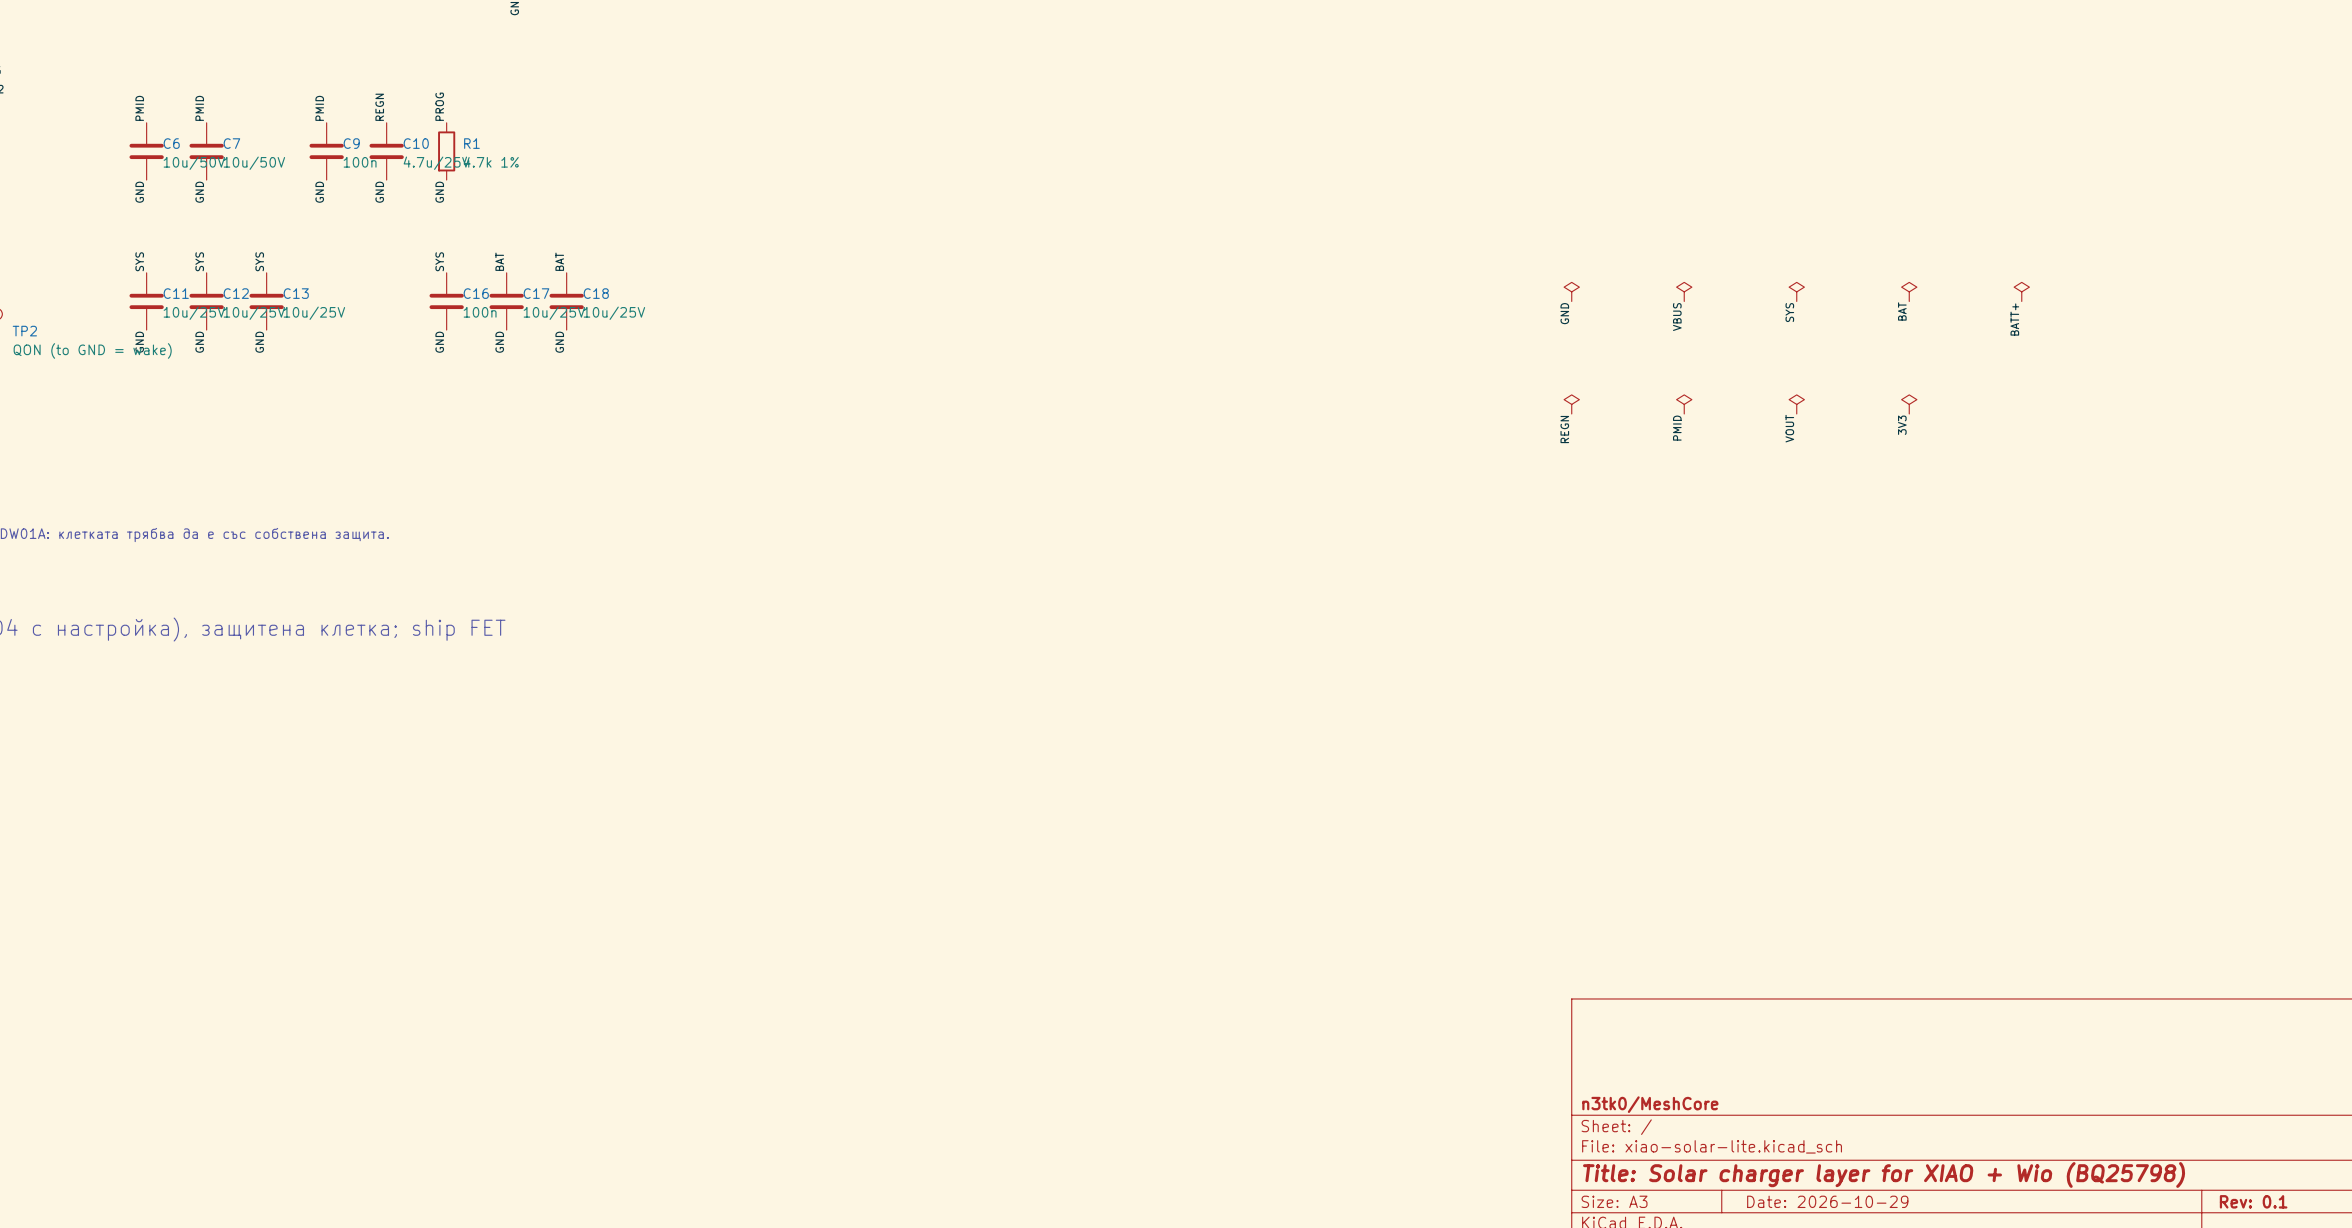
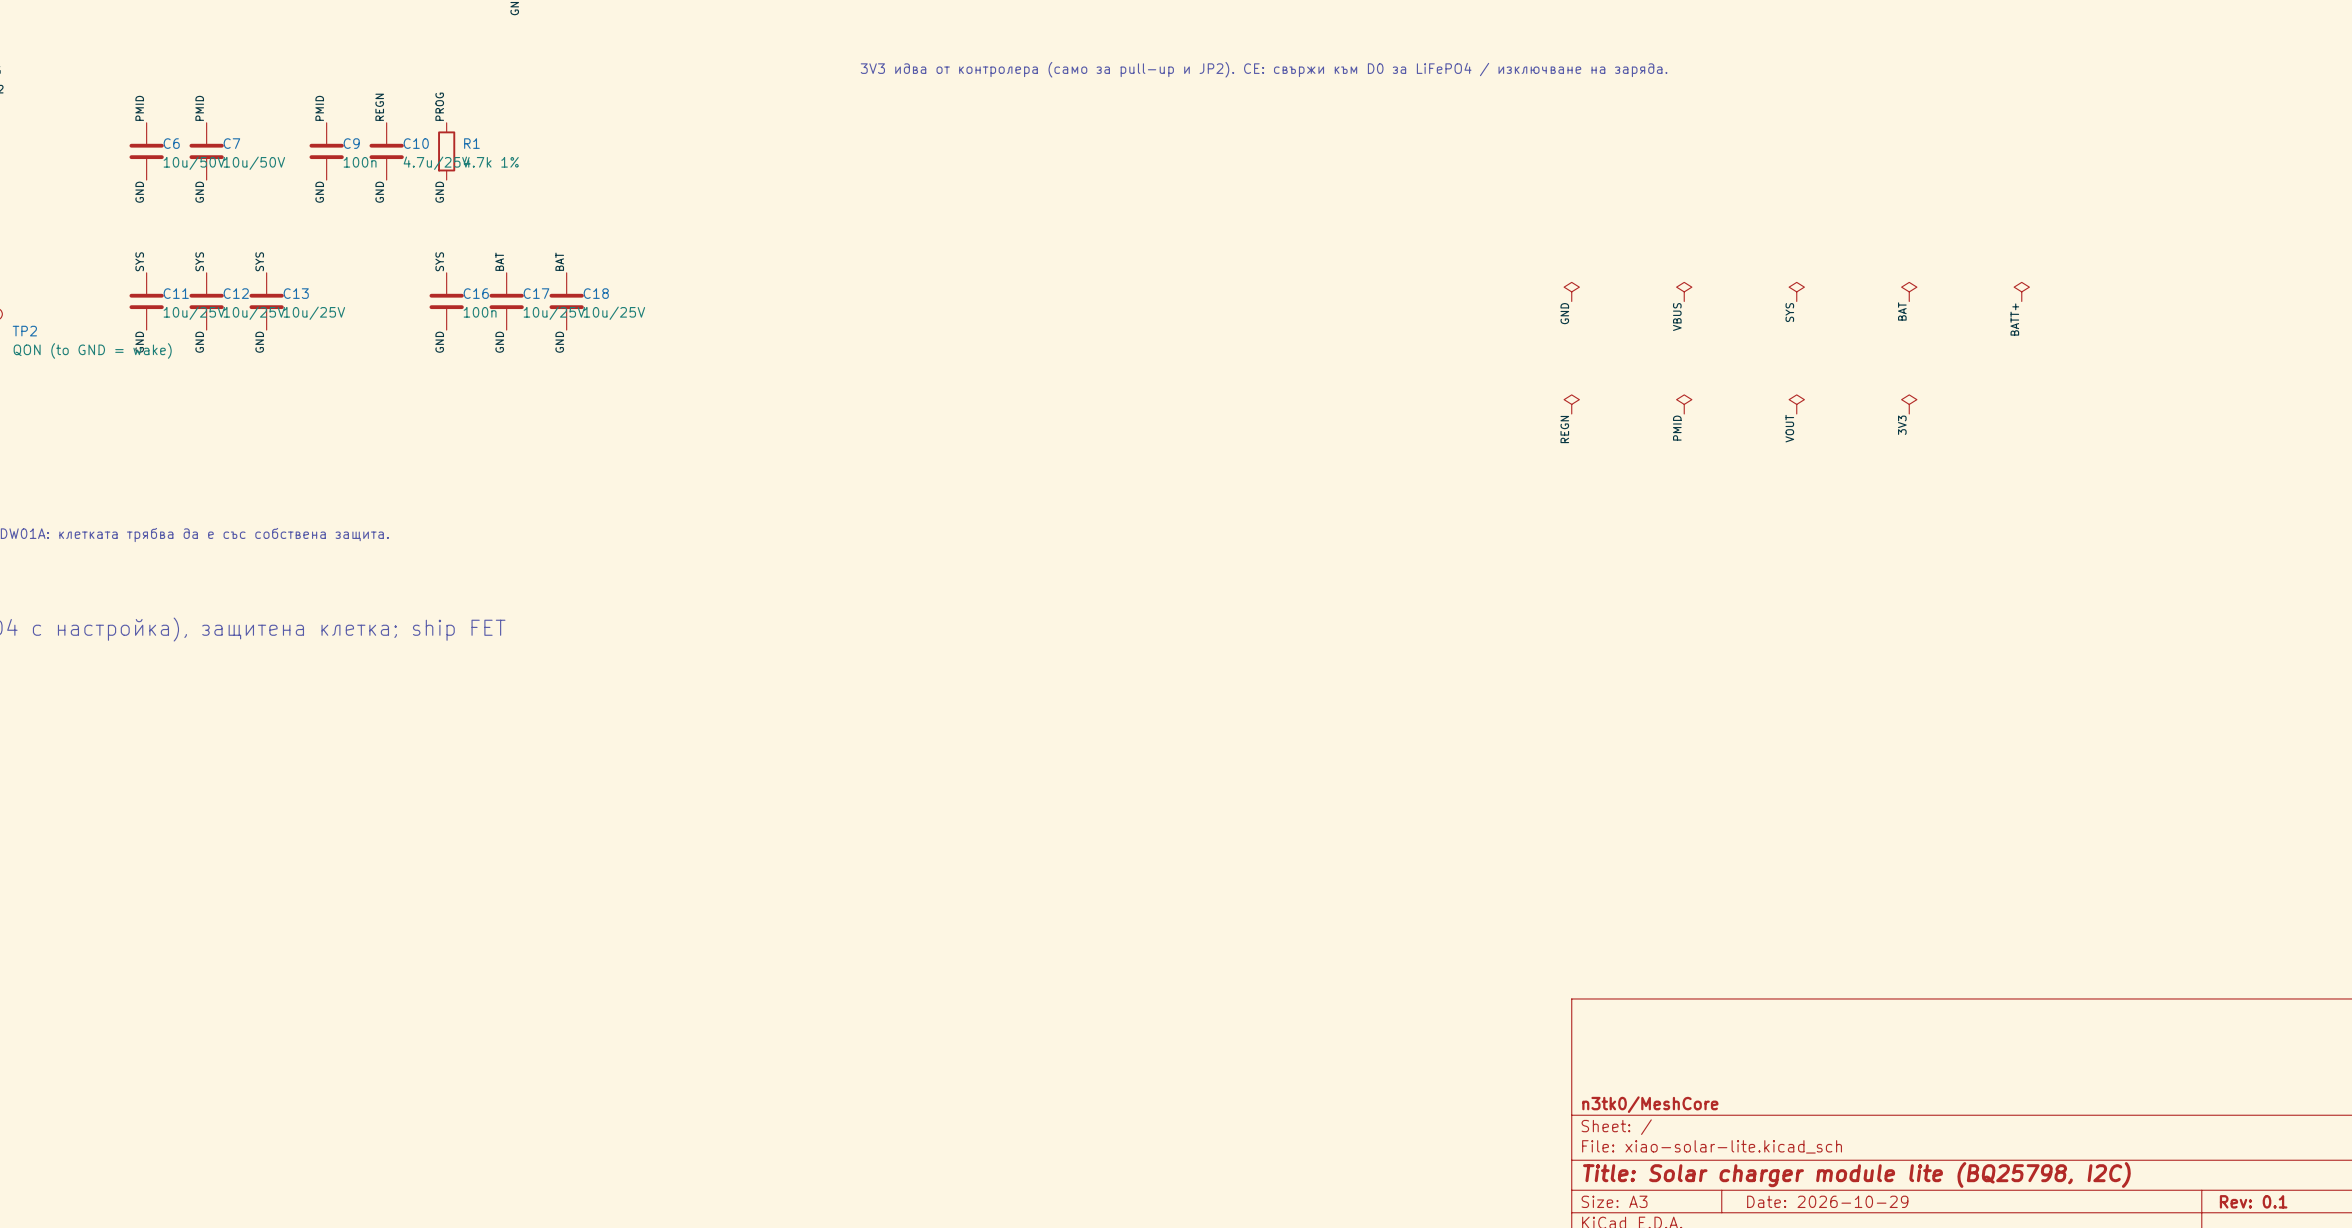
text: none -> 3V3 идва от контролера (само за pull-up и JP2). CE: свържи към D0 за LiFePO4 / изключване на заряда. (1264, 69)
title block: Title: Solar charger layer for XIAO + Wio (BQ25798) (1884, 1174) -> Title: Solar charger module lite (BQ25798, I2C) (1856, 1174)

